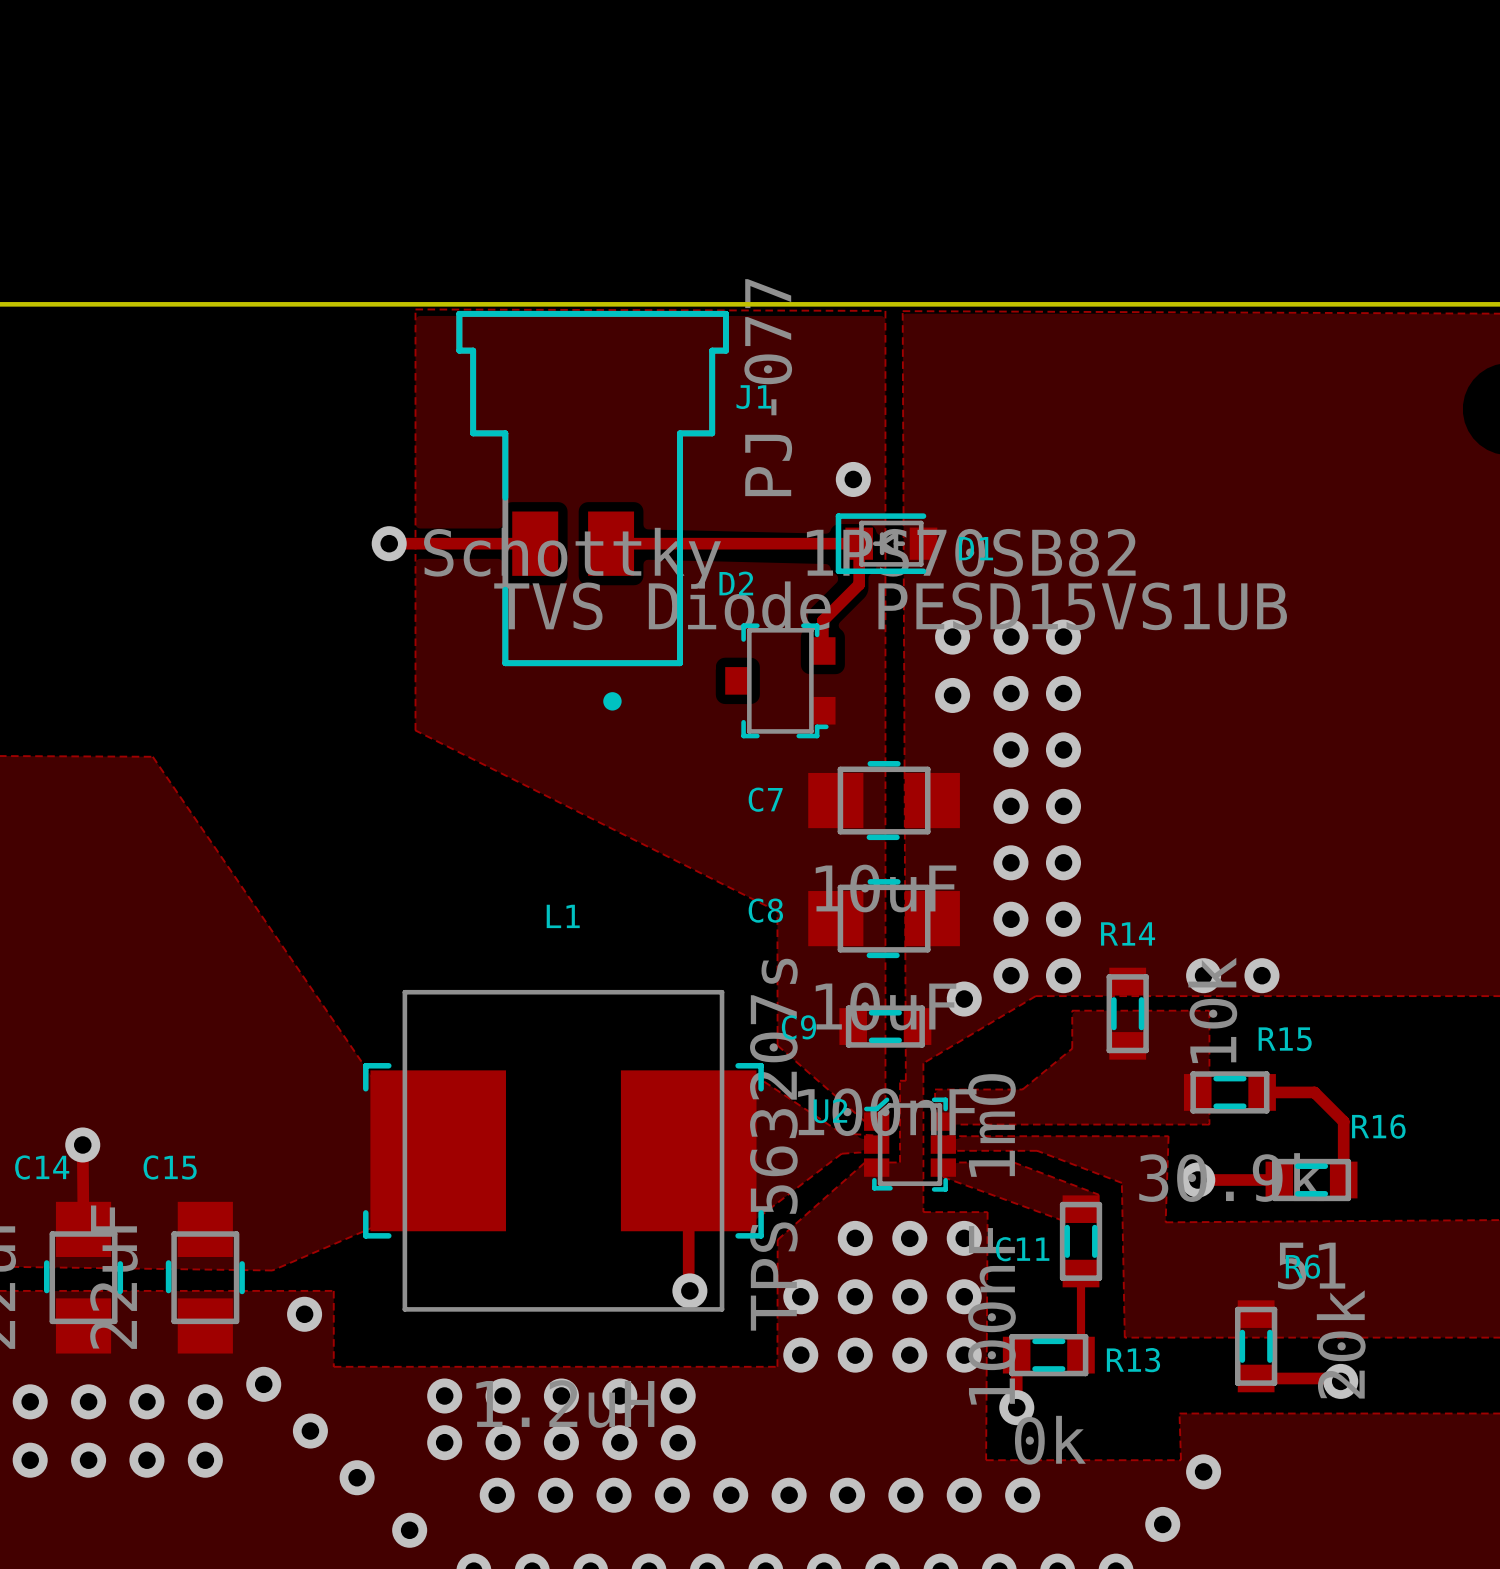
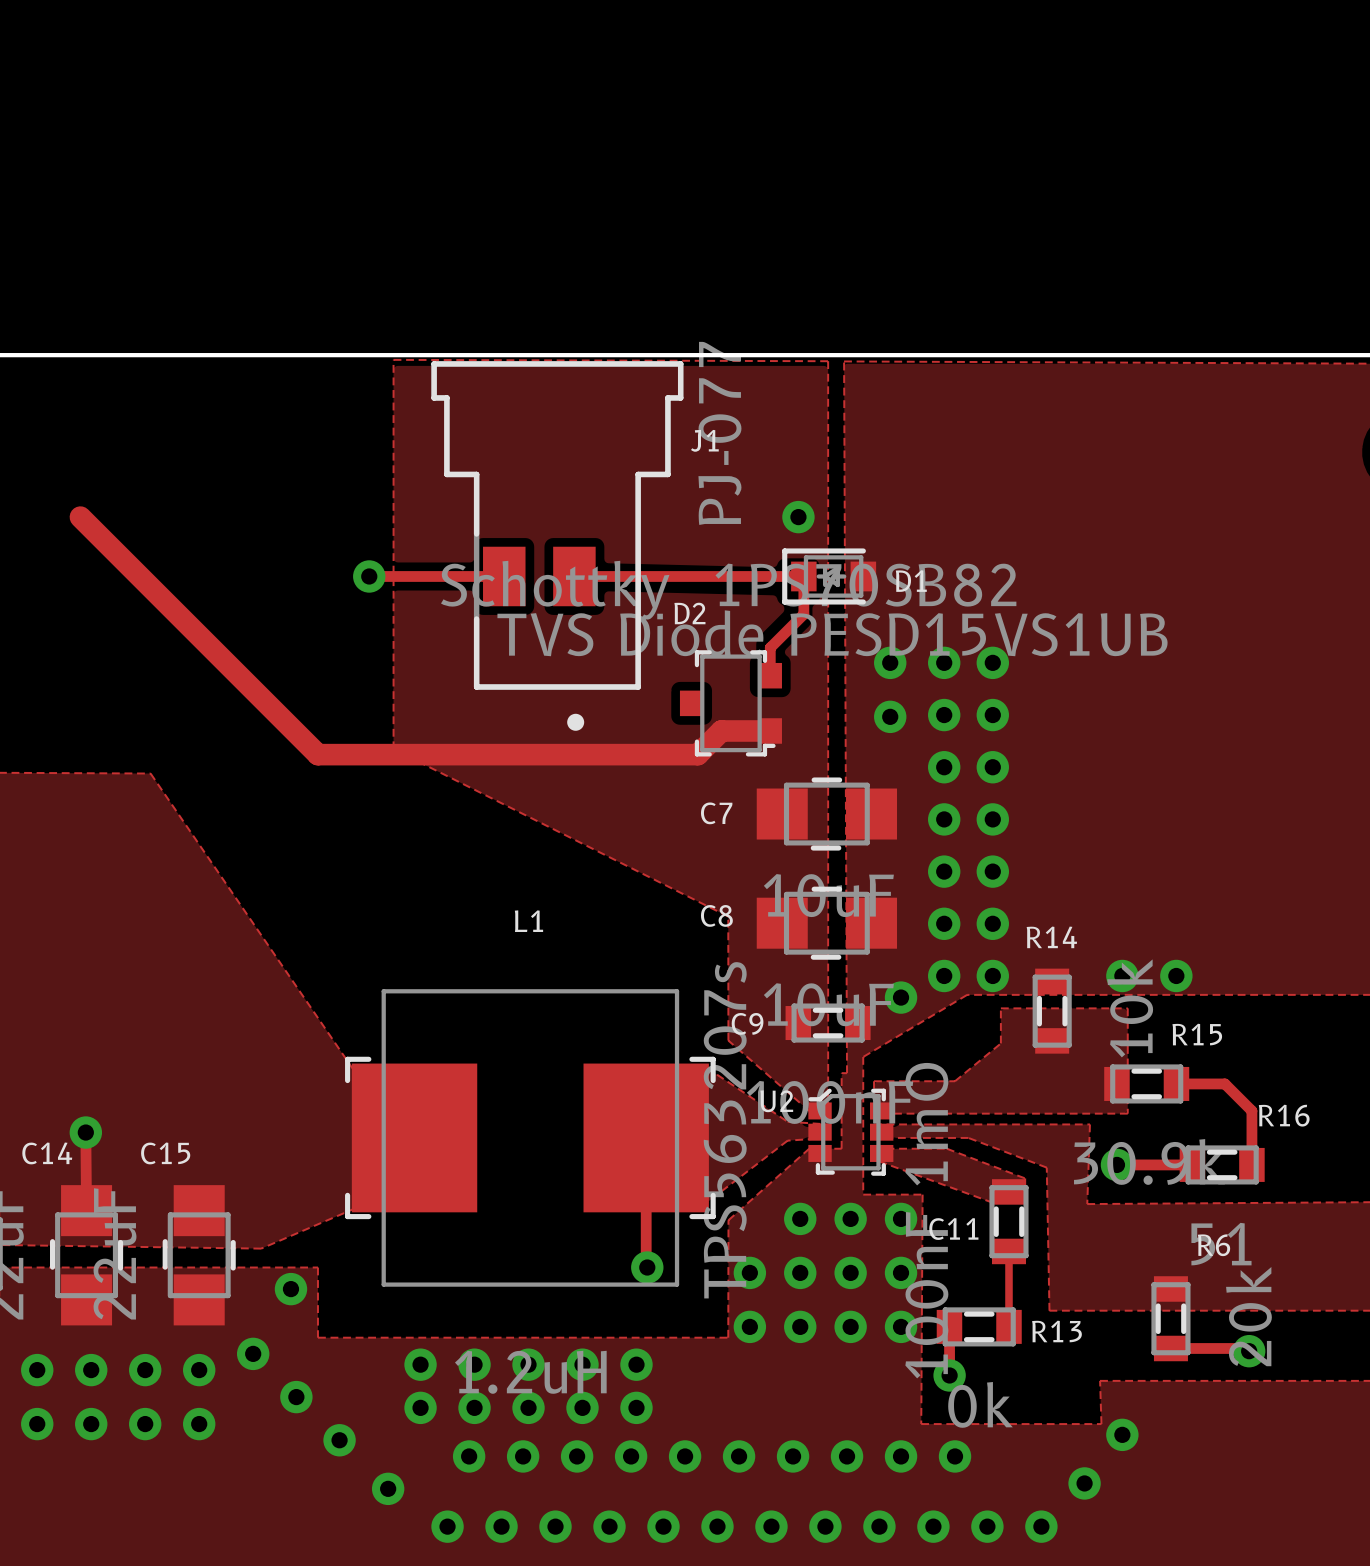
track: none -> (80, 517) (317, 754) (697, 754) (721, 730) (770, 730)

